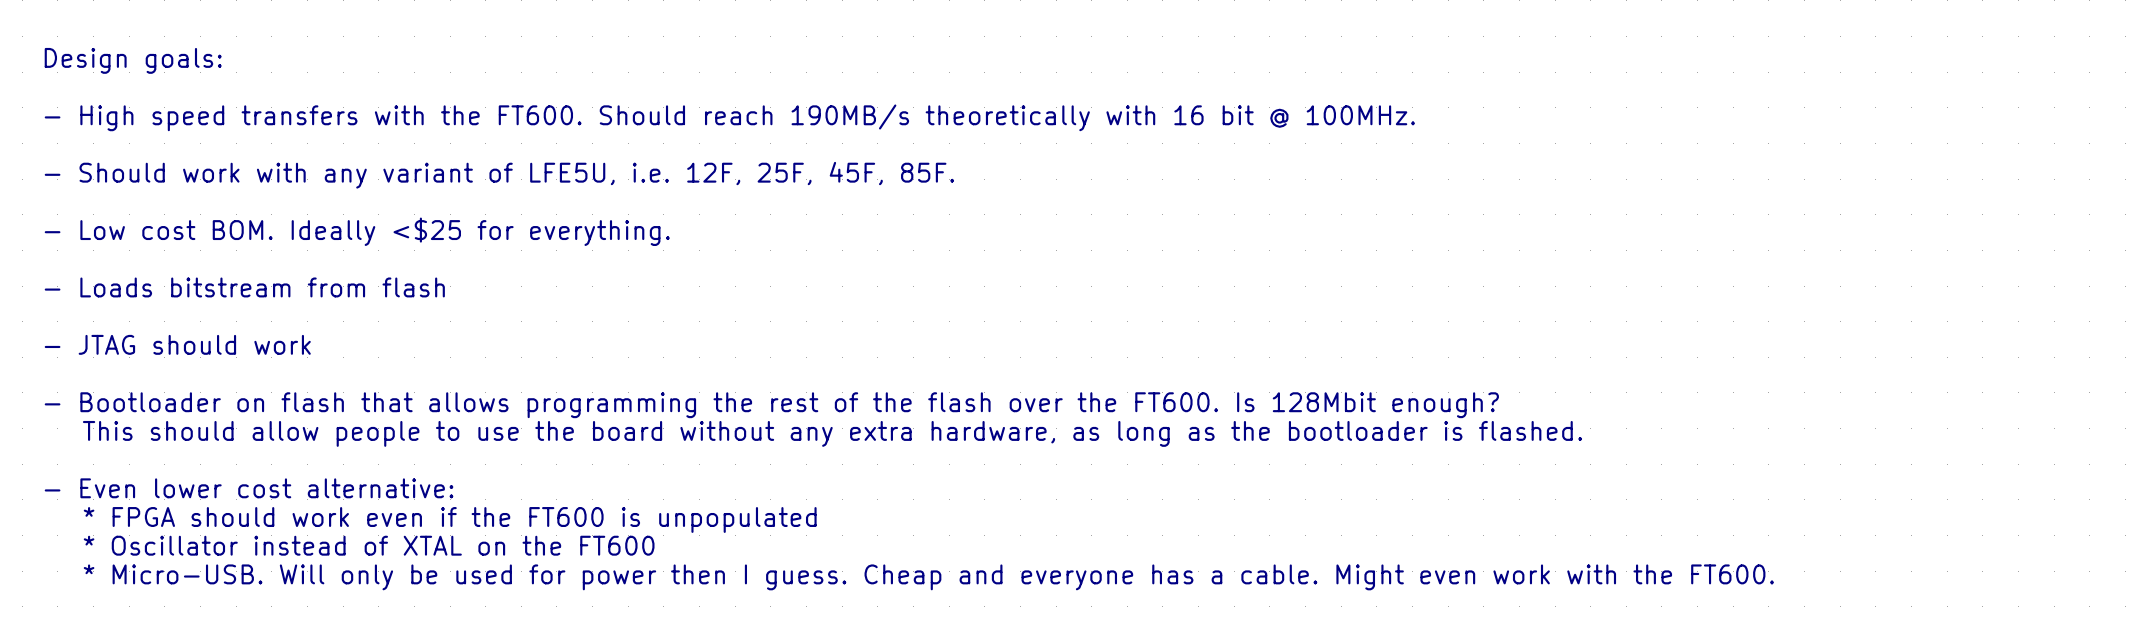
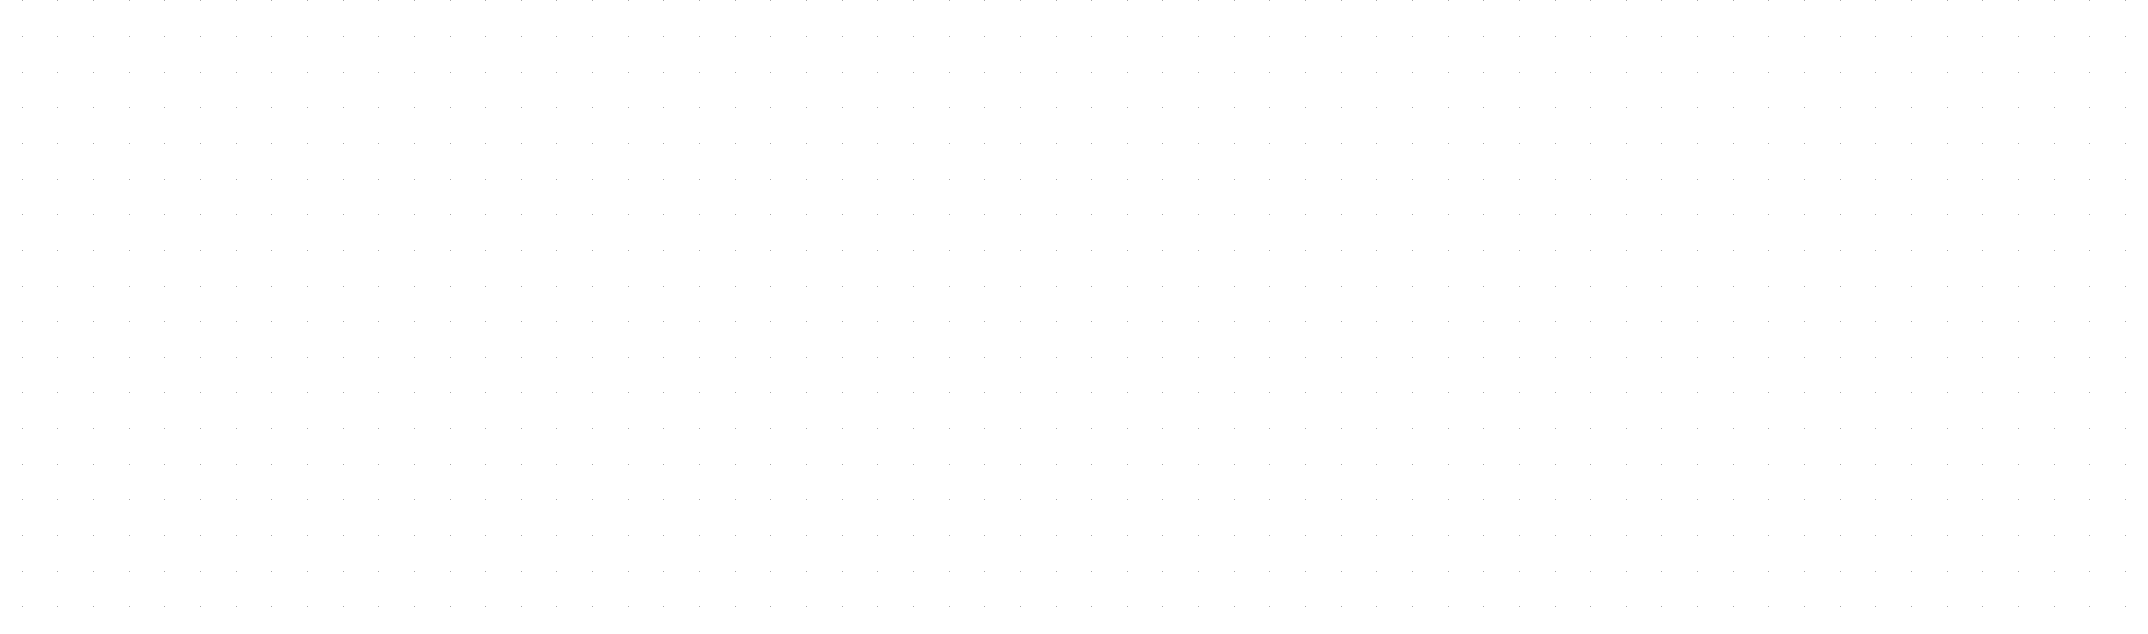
text: Design goals: (133, 60) -> none
text: - High speed transfers with the FT600. Should reach 190MB/s theoretically with 16 bit @ 100MHz. (729, 117) -> none
text: - Should work with any variant of LFE5U, i.e. 12F, 25F, 45F, 85F. (499, 175) -> none
text: - Low cost BOM. Ideally <$25 for everything. (357, 231) -> none
text: - Loads bitstream from flash (244, 287) -> none
text: - JTAG should work (177, 344) -> none
text: - Bootloader on flash that allows programming the rest of the flash over the FT600. Is 128Mbit enough? (771, 405) -> none
text: This should allow people to use the board without any extra hardware, as long as the bootloader is flashed. (832, 433) -> none
text: - Even lower cost alternative: (249, 488) -> none
text: * FPGA should work even if the FT600 is unpopulated (450, 519) -> none
text: * Oscillator instead of XTAL on the FT600 (369, 545) -> none
text: * Micro-USB. Will only be used for power then I guess. Cheap and everyone has a cable. Might even work with the FT600. (928, 577) -> none

